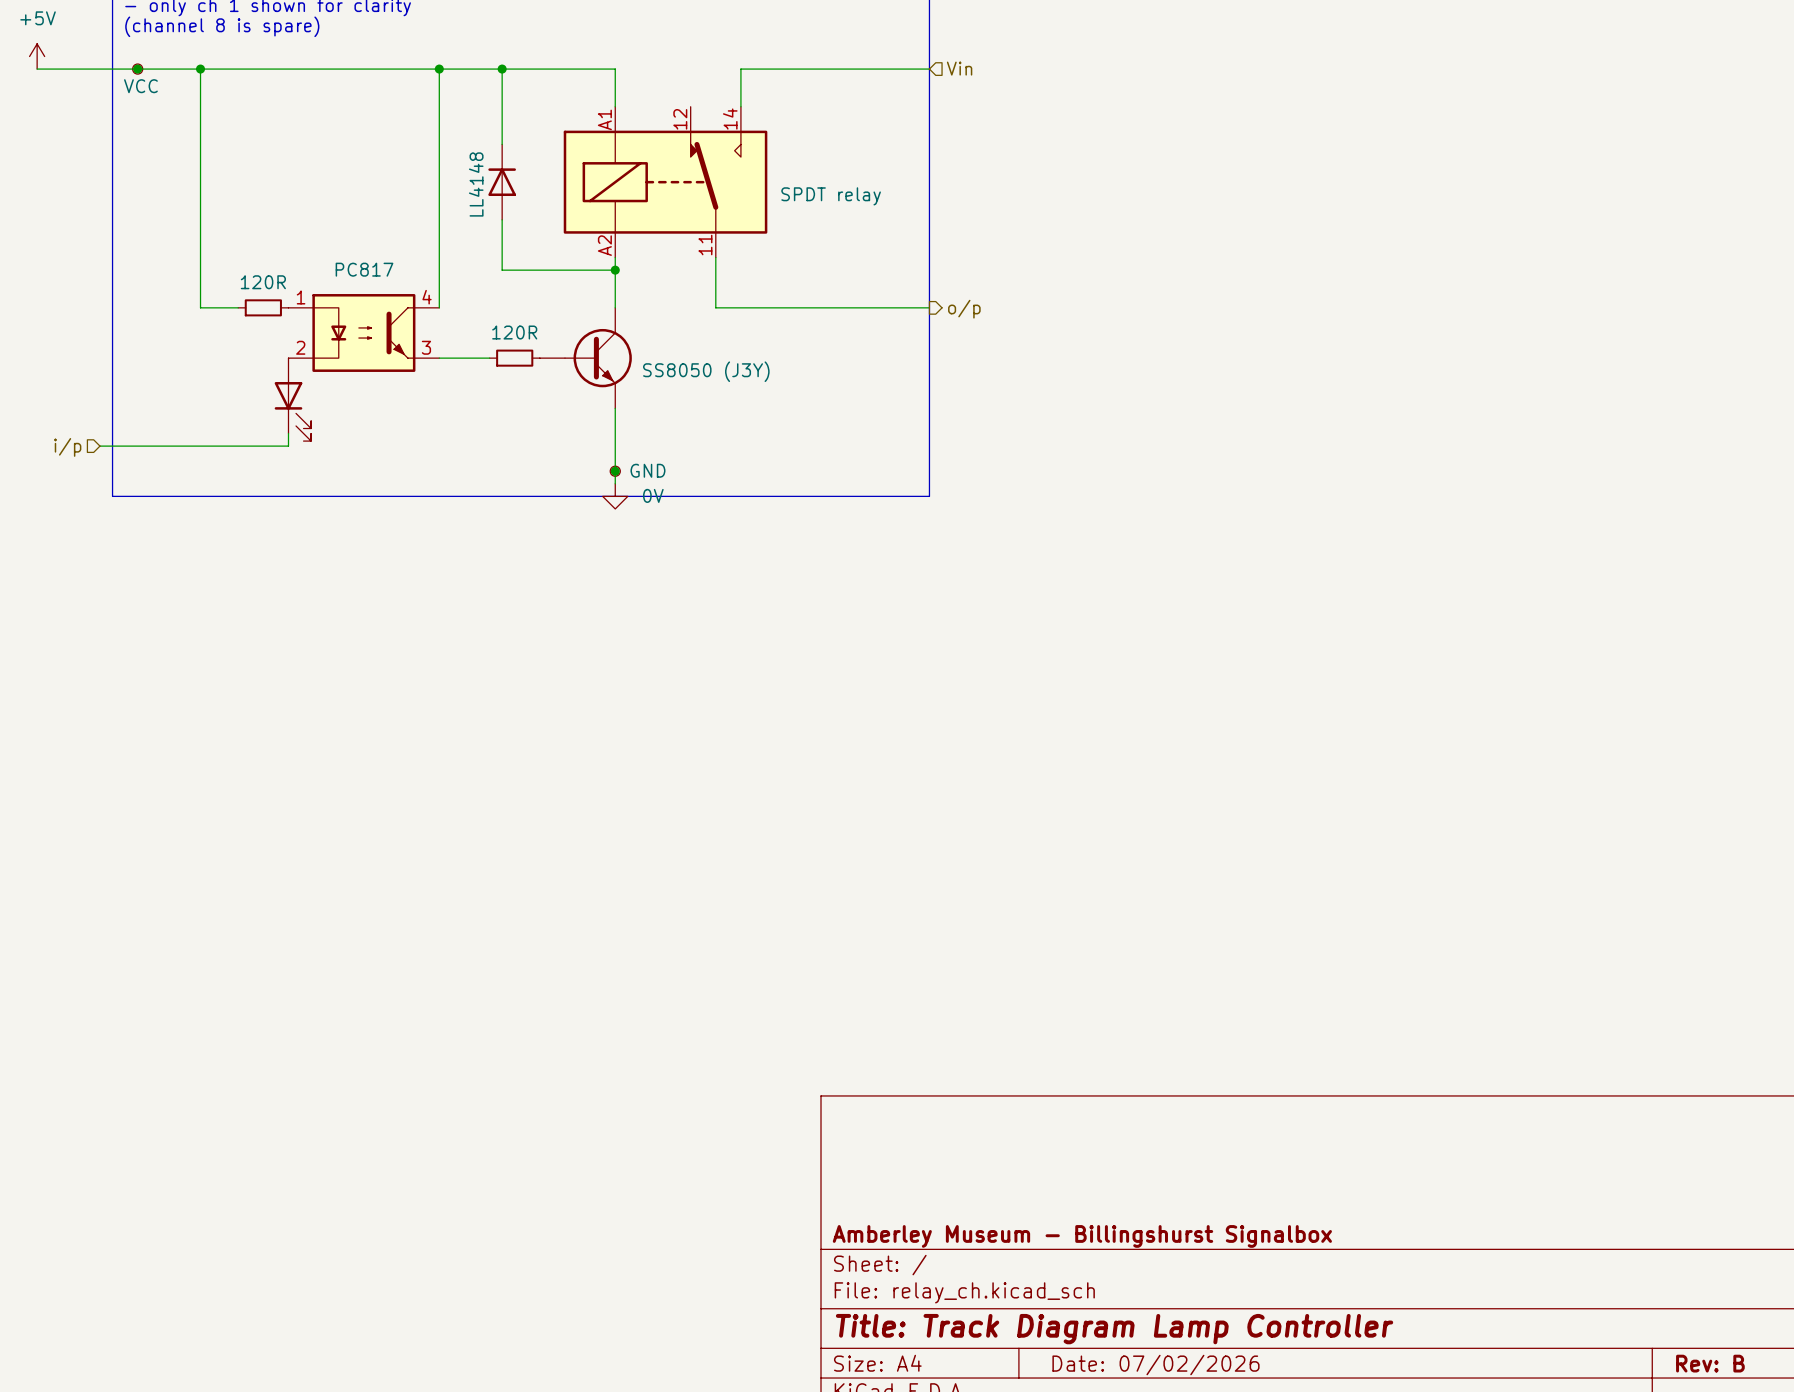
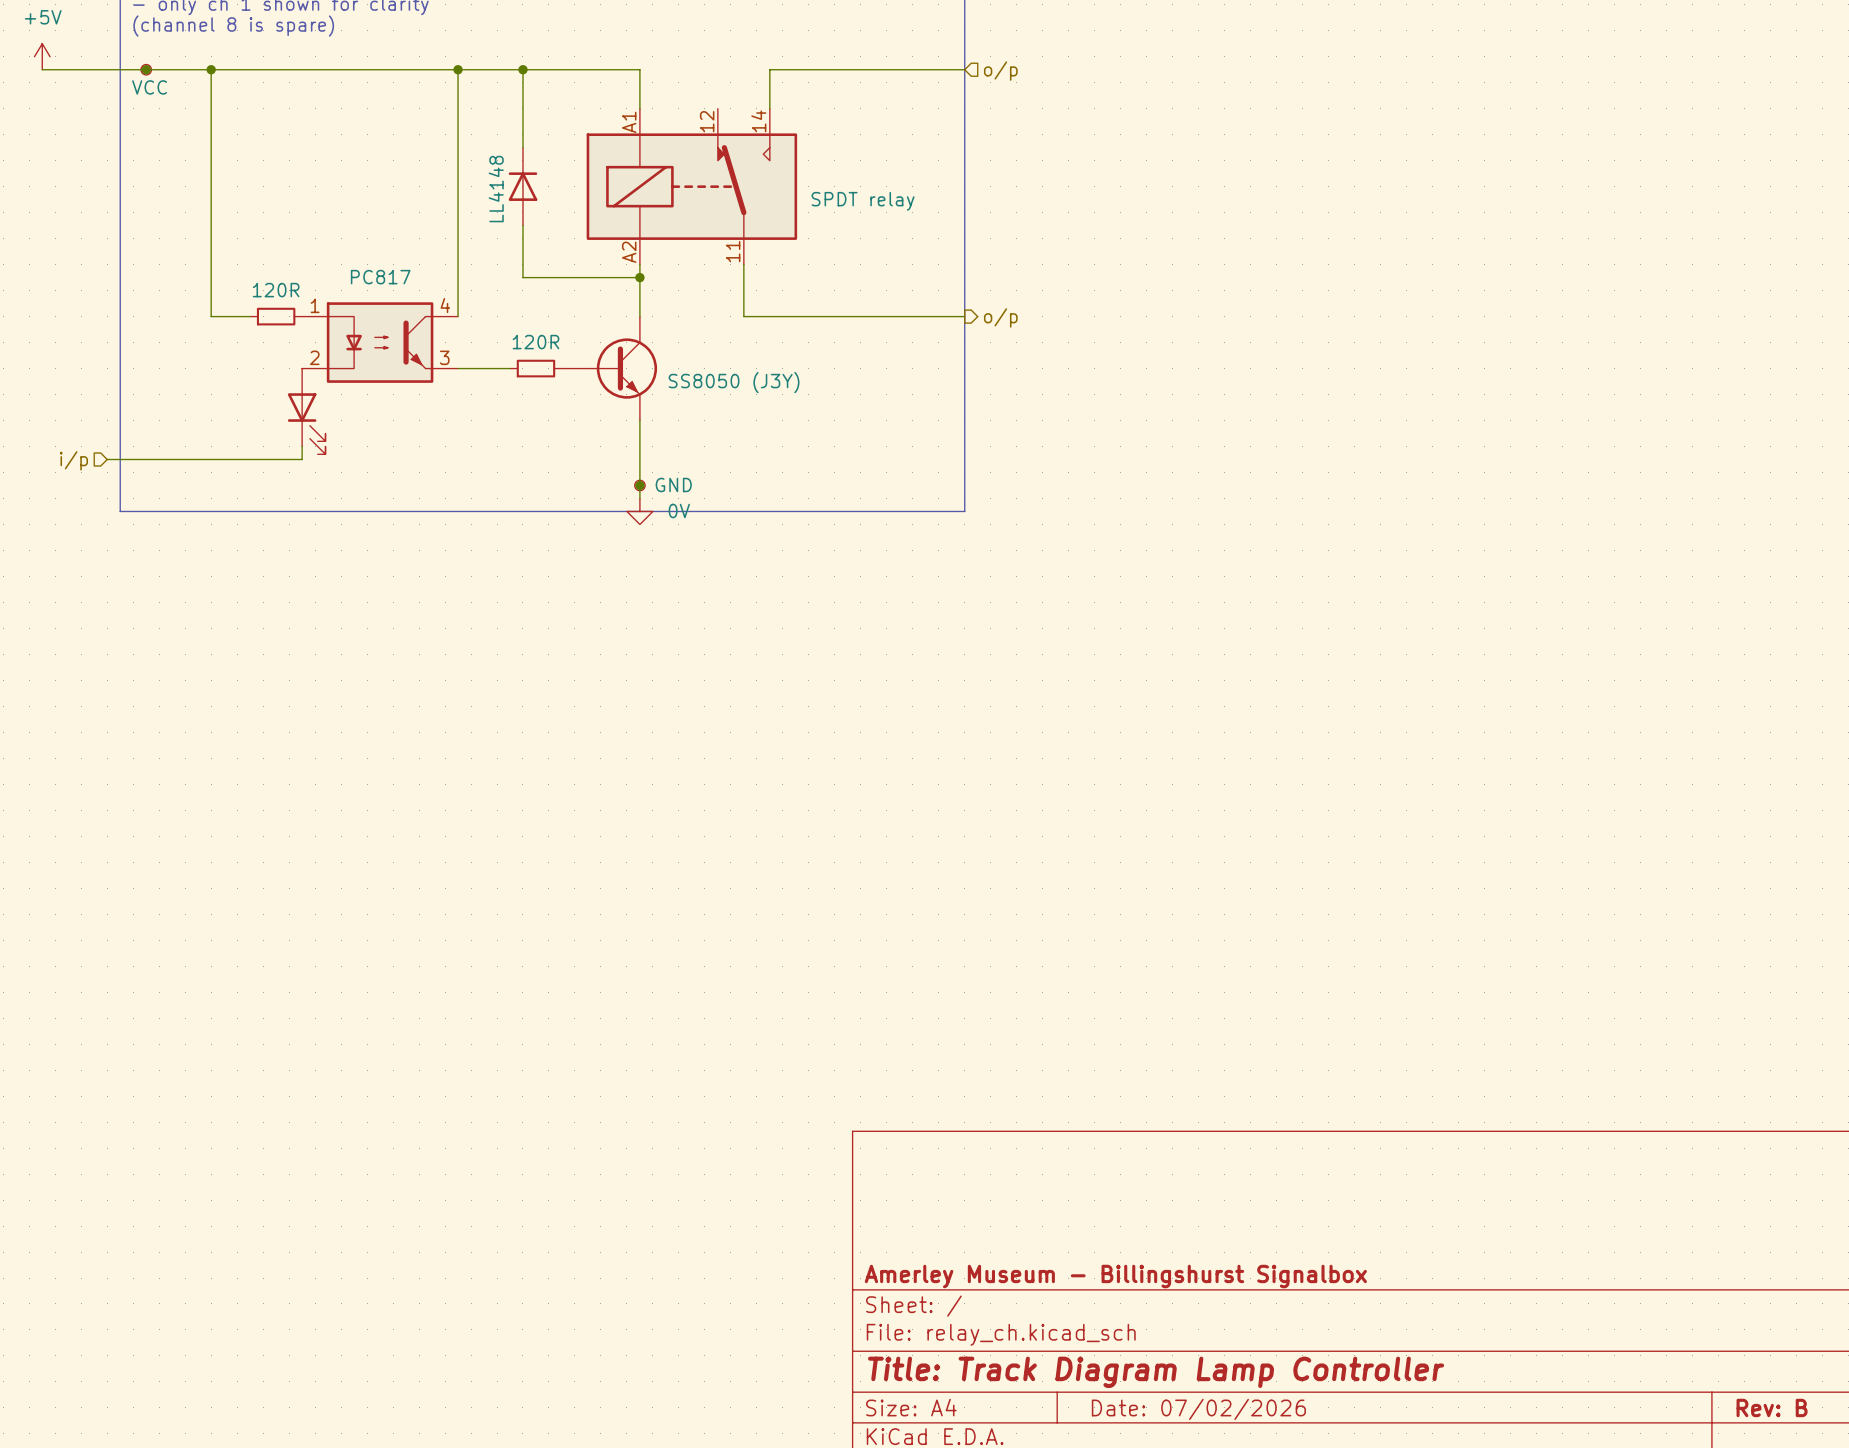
hierarchical label: Vin (959, 68) -> o/p (1000, 71)
title block: Amberley Museum - Billingshurst Signalbox (1082, 1236) -> Amerley Museum - Billingshurst Signalbox (1115, 1276)

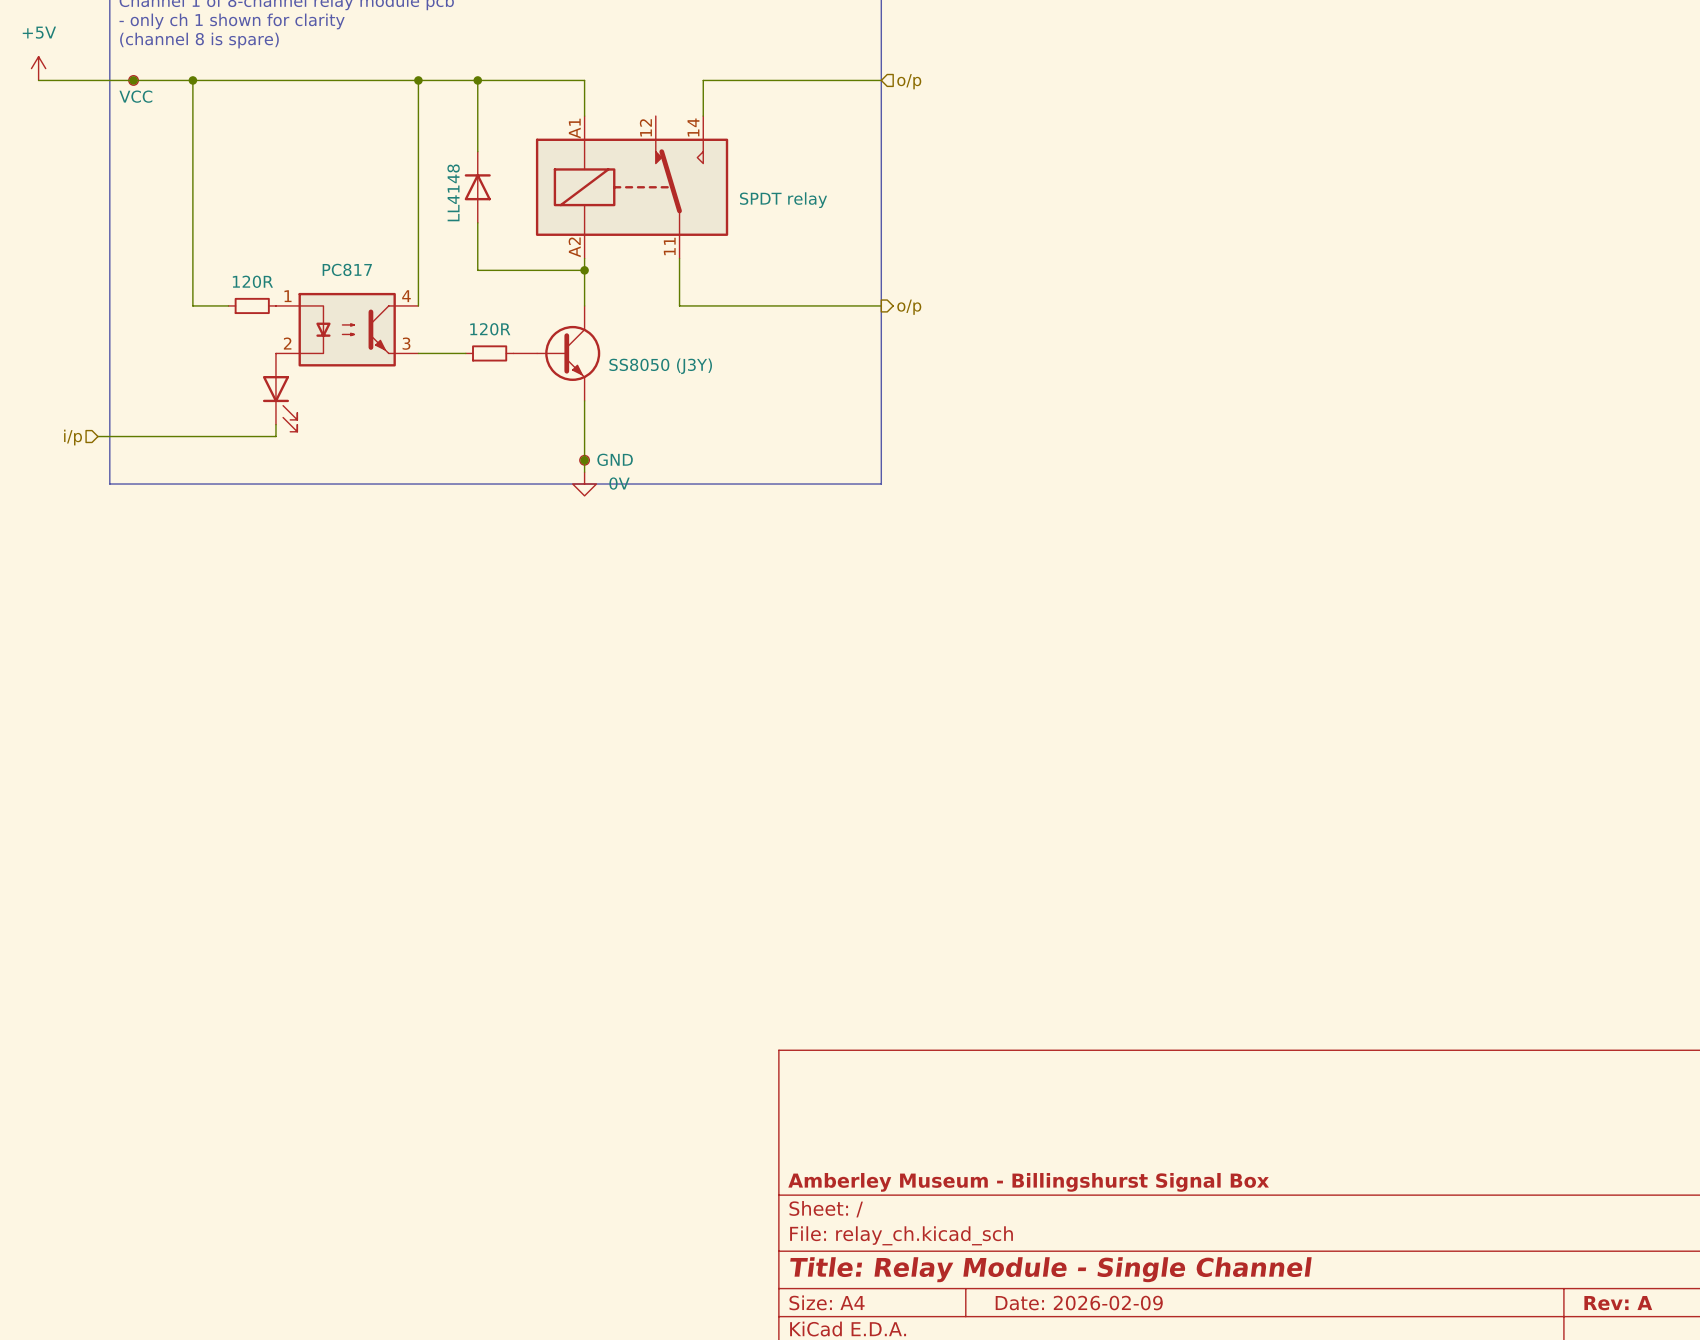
title block: Amerley Museum - Billingshurst Signalbox (1115, 1276) -> Amberley Museum - Billingshurst Signal Box (1028, 1182)
title block: Title: Track Diagram Lamp Controller (1156, 1372) -> Title: Relay Module - Single Channel (1050, 1269)
title block: Rev: B (1772, 1407) -> Rev: A (1618, 1303)
title block: Date: 07/02/2026 (1198, 1409) -> Date: 2026-02-09 (1079, 1303)

